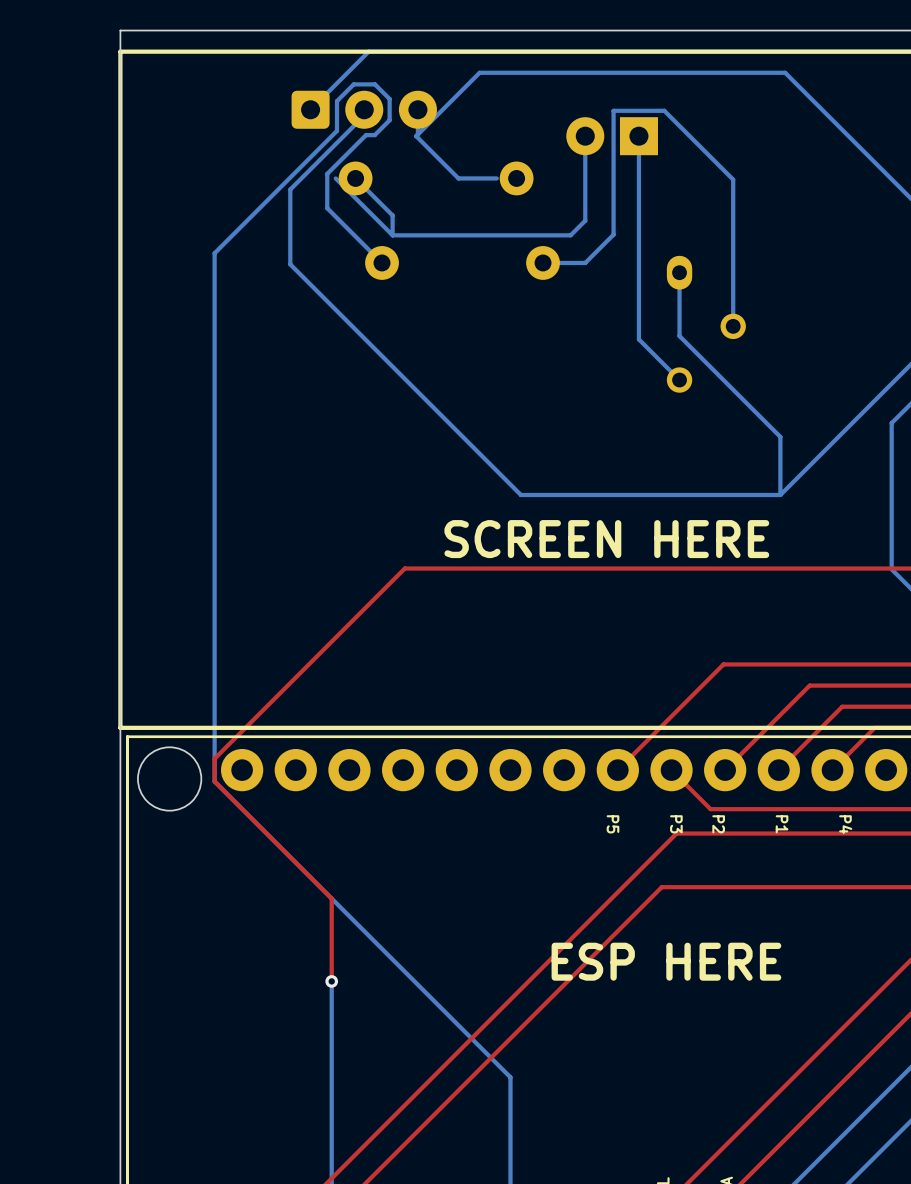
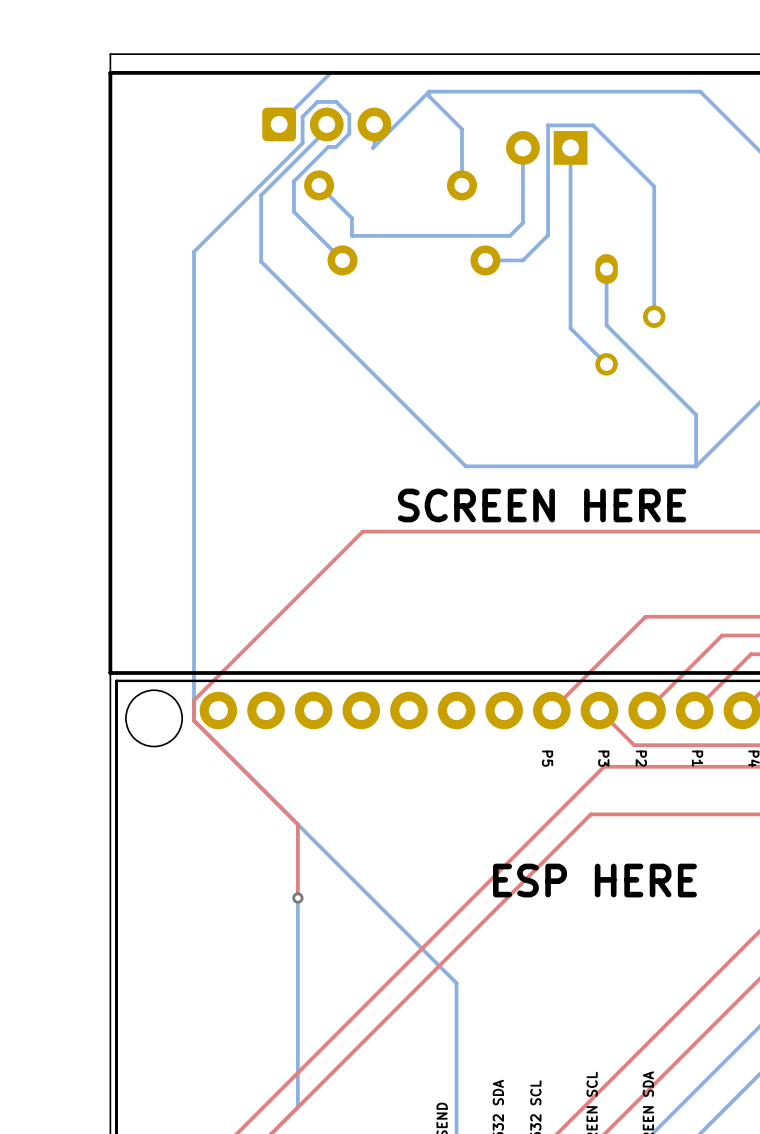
bottom track: none -> (429, 91) (429, 96) (461, 129) (461, 185)
bottom track: (416, 136) (458, 178) (496, 178) -> none
bottom track: (335, 178) (392, 235) -> none

